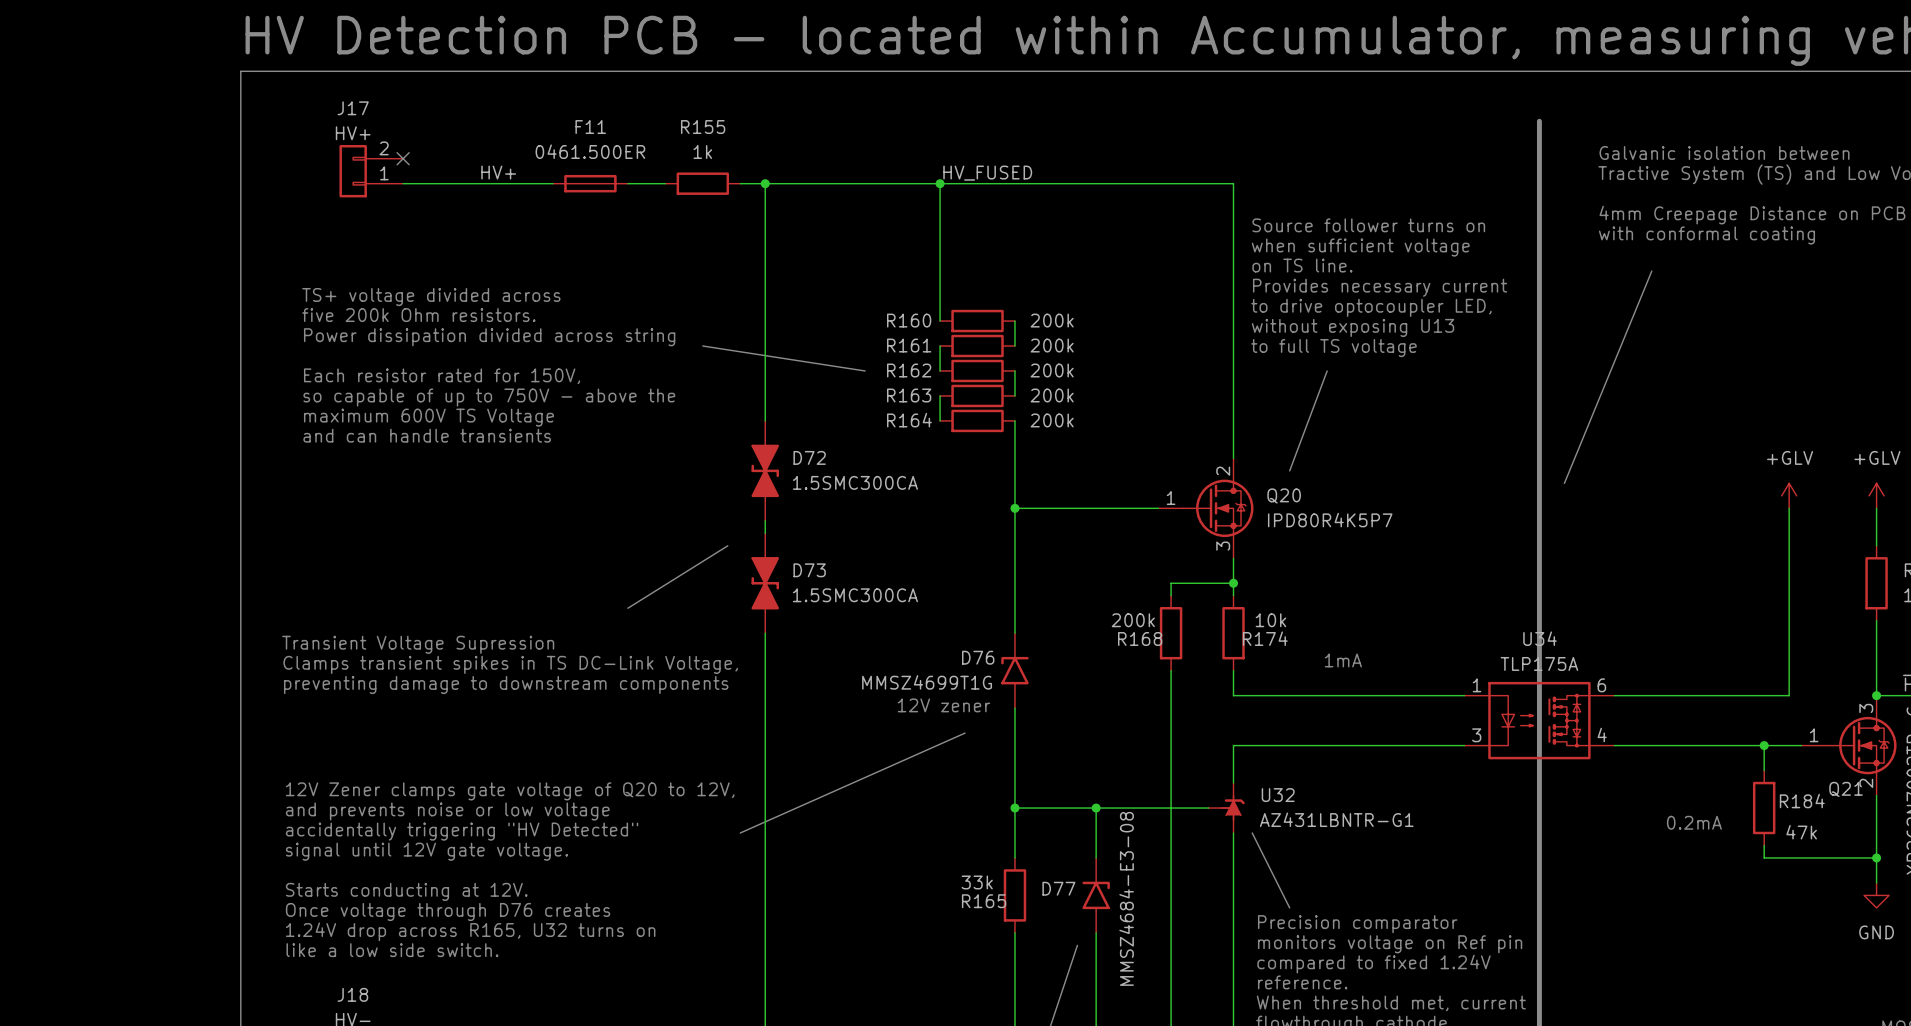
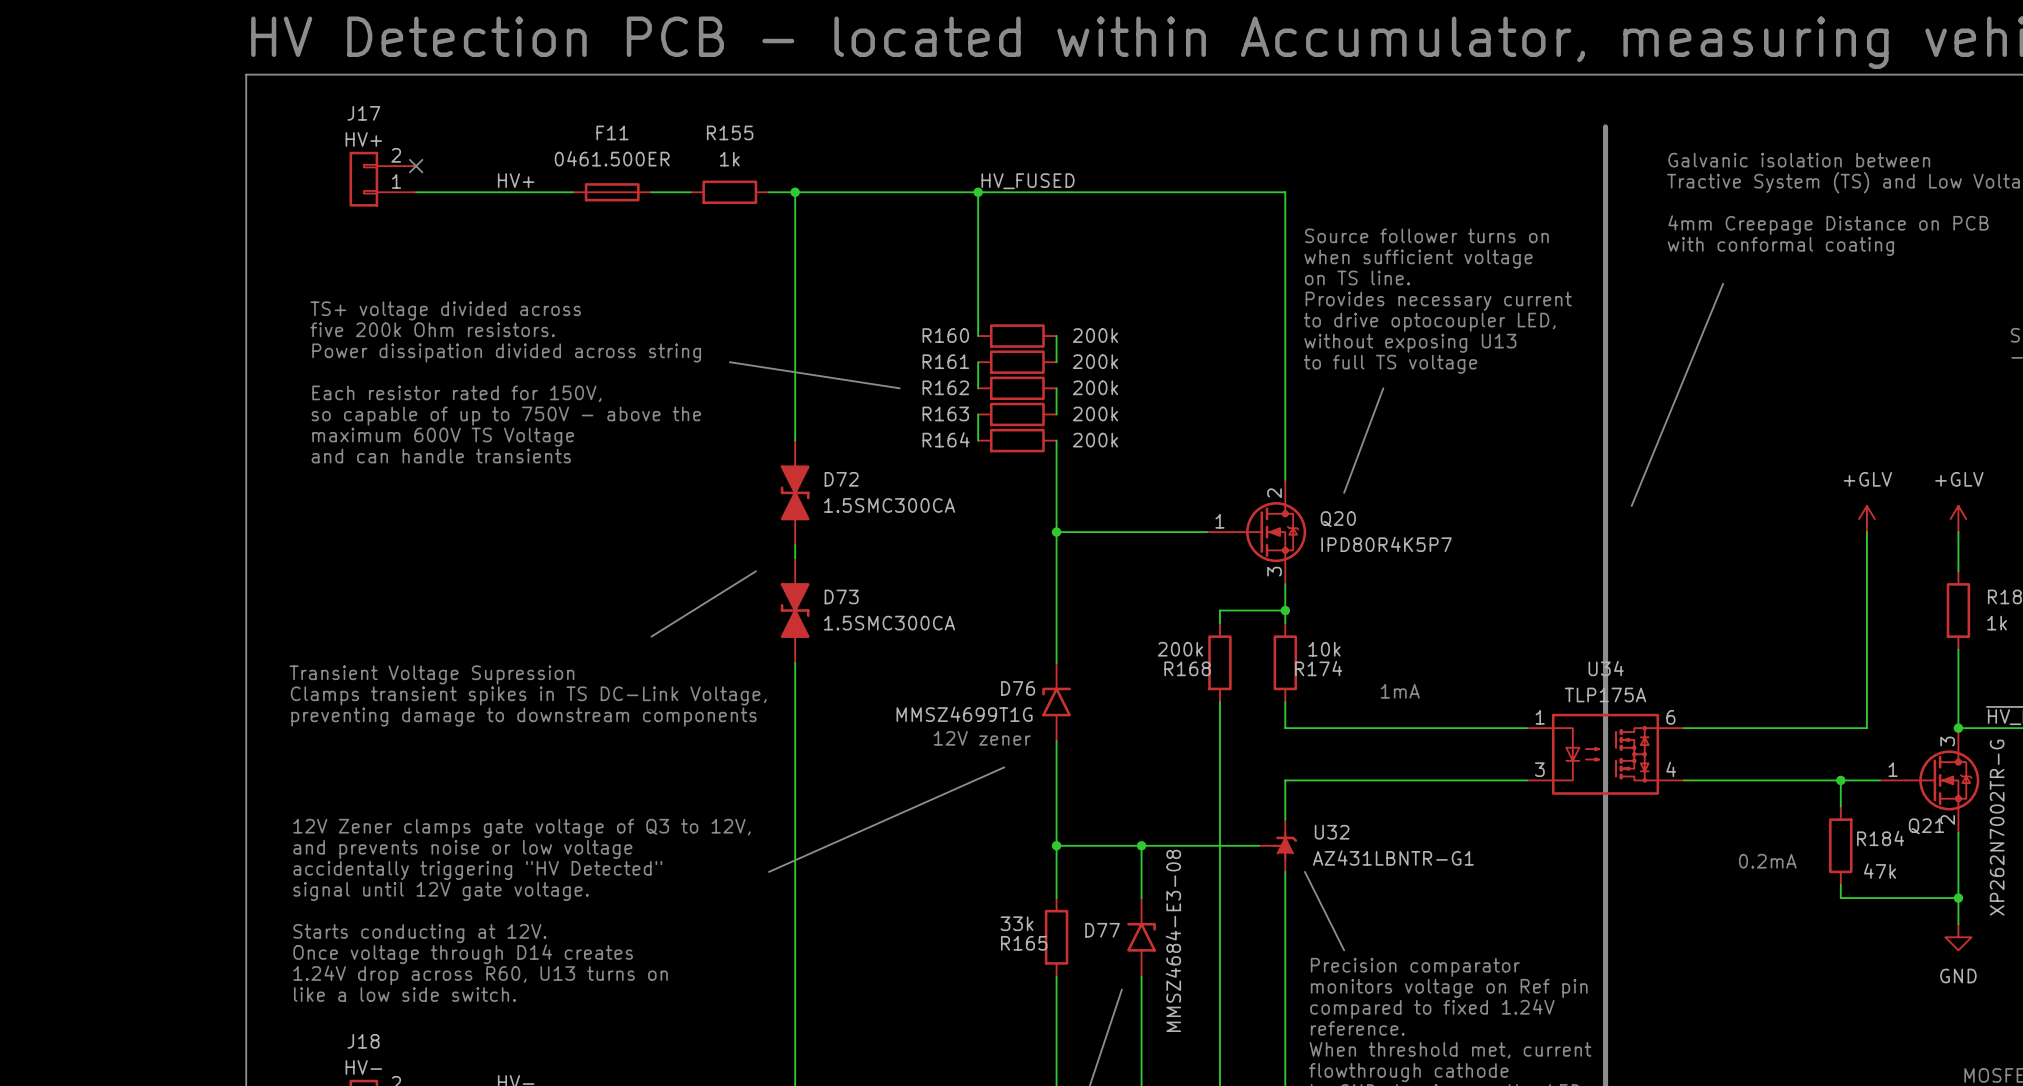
text: 12V Zener clamps gate voltage of Q20 to 12V, (510, 791) -> 12V Zener clamps gate voltage of Q3 to 12V, (521, 828)
text: Once voltage through D76 creates (448, 912) -> Once voltage through D14 creates (463, 954)
text: 1.24V drop across R165, U32 turns on (470, 931) -> 1.24V drop across R60, U13 turns on (480, 975)

